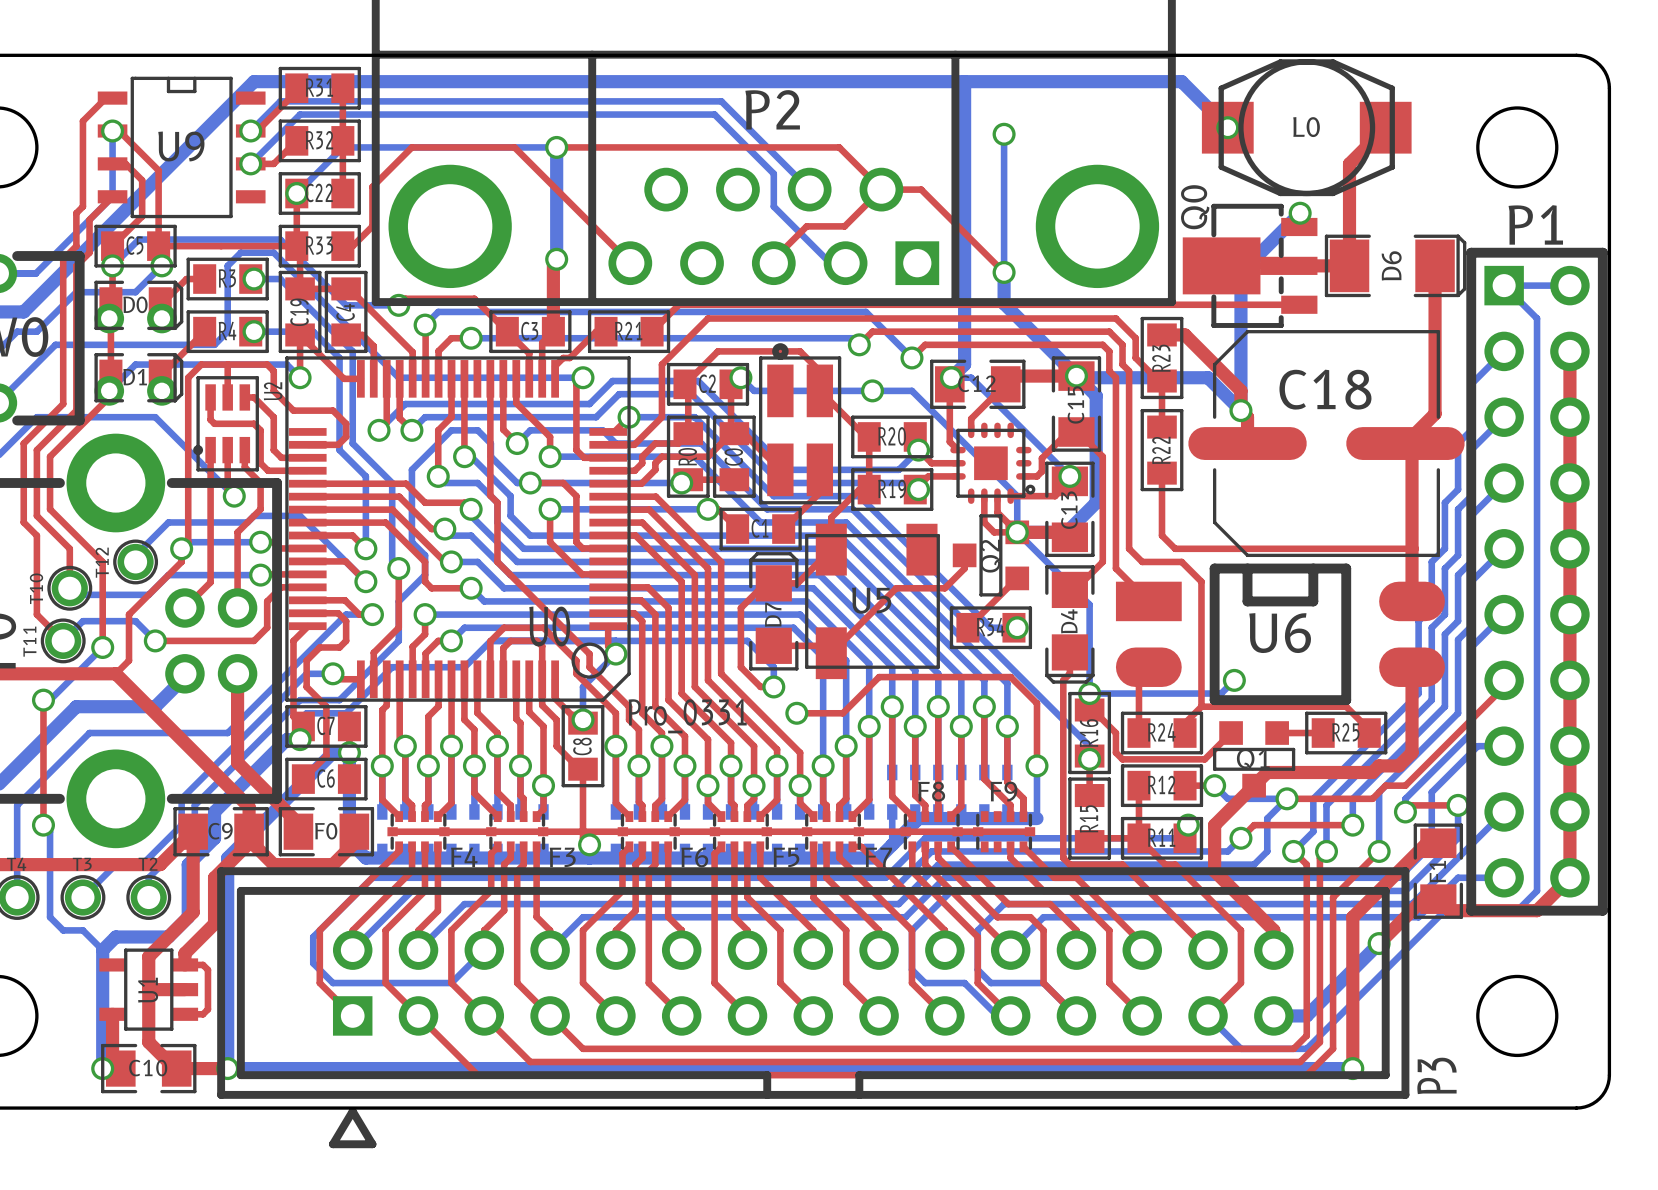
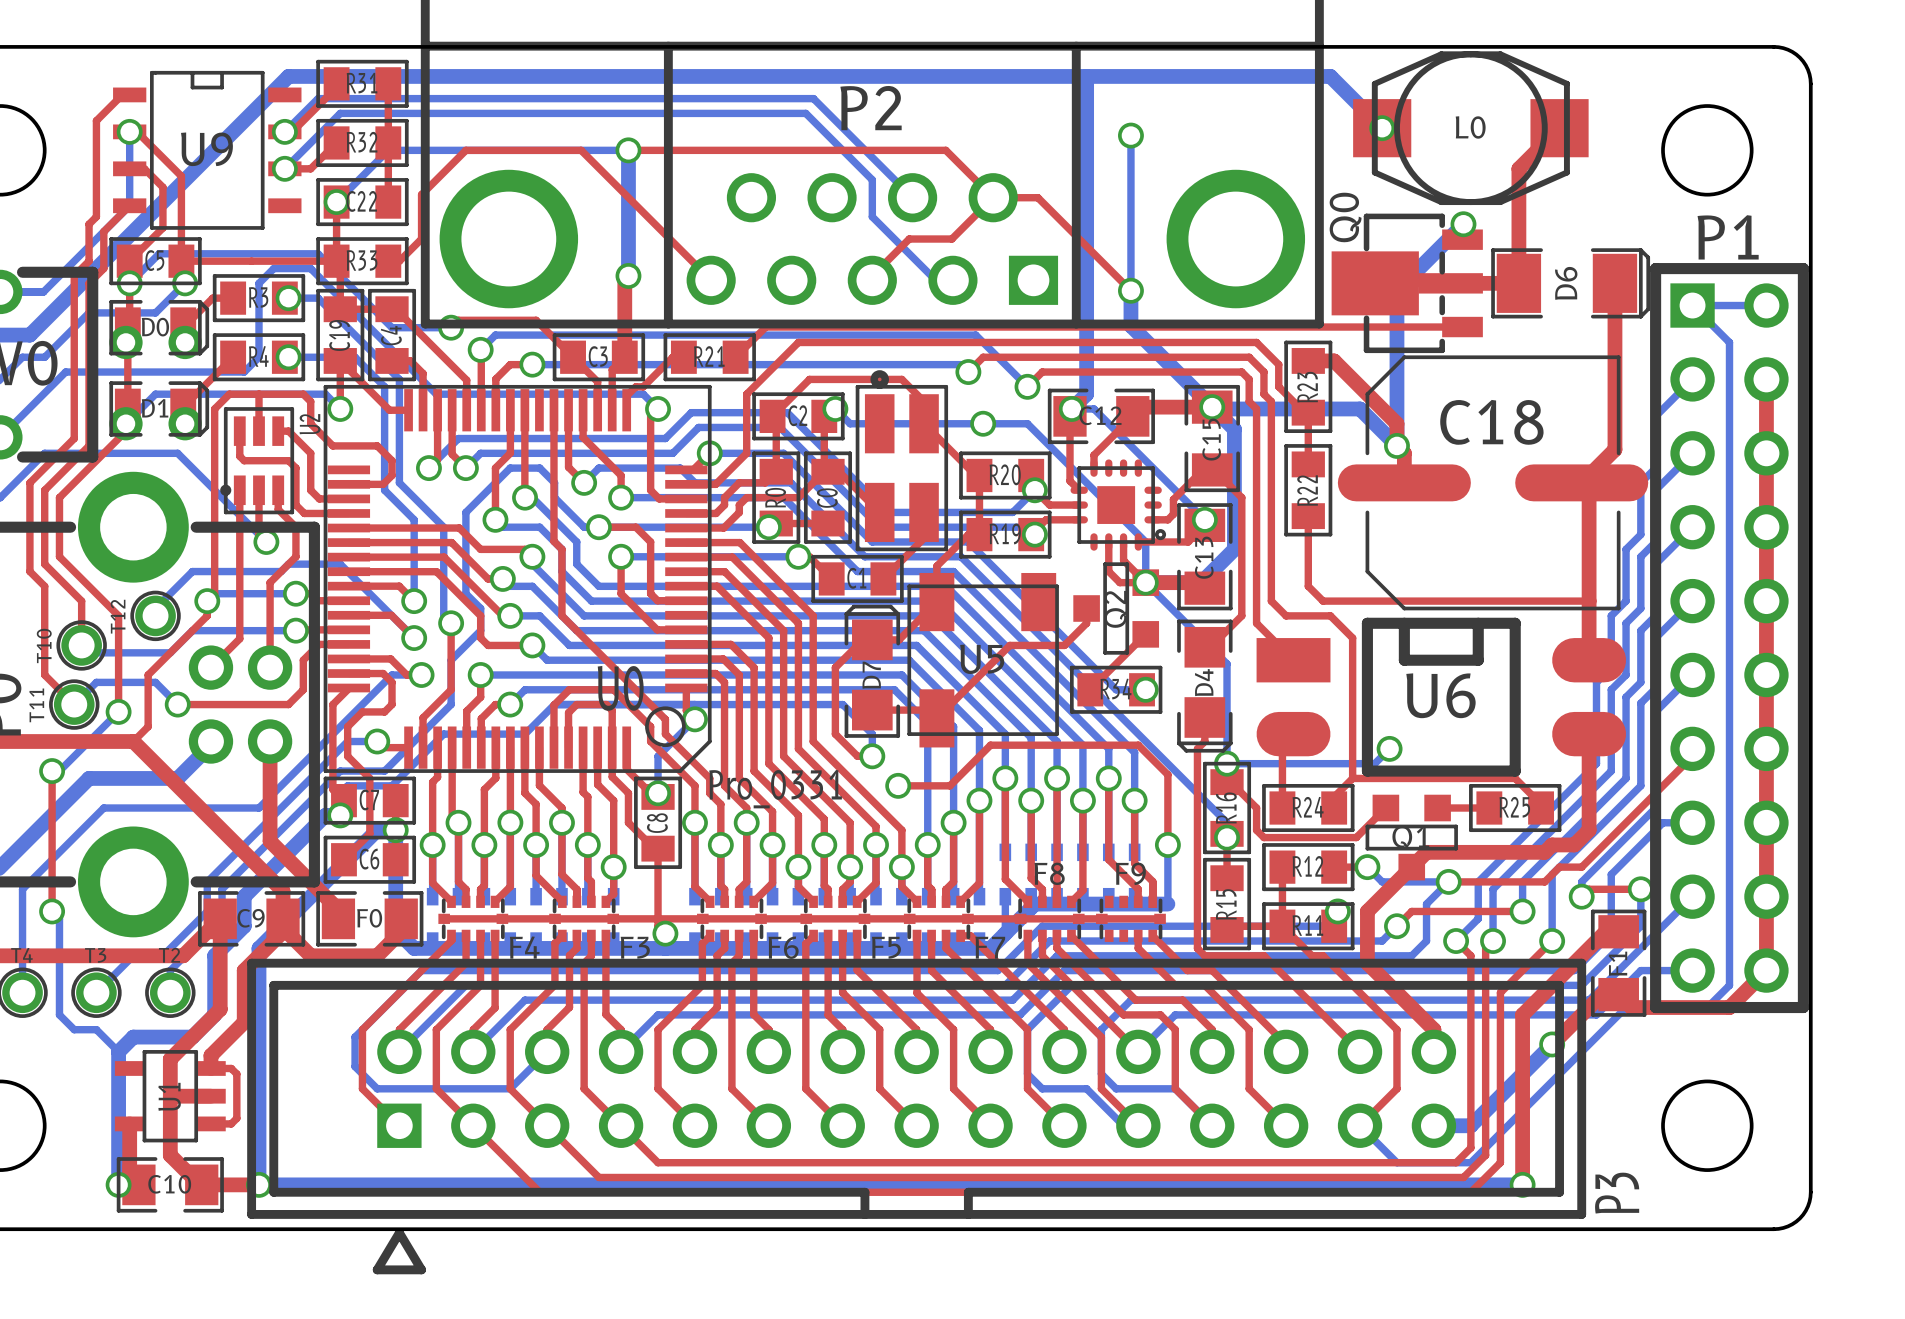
bottom track: (385, 364) (398, 377) (583, 377) -> (436, 394) (643, 394) (658, 408)

